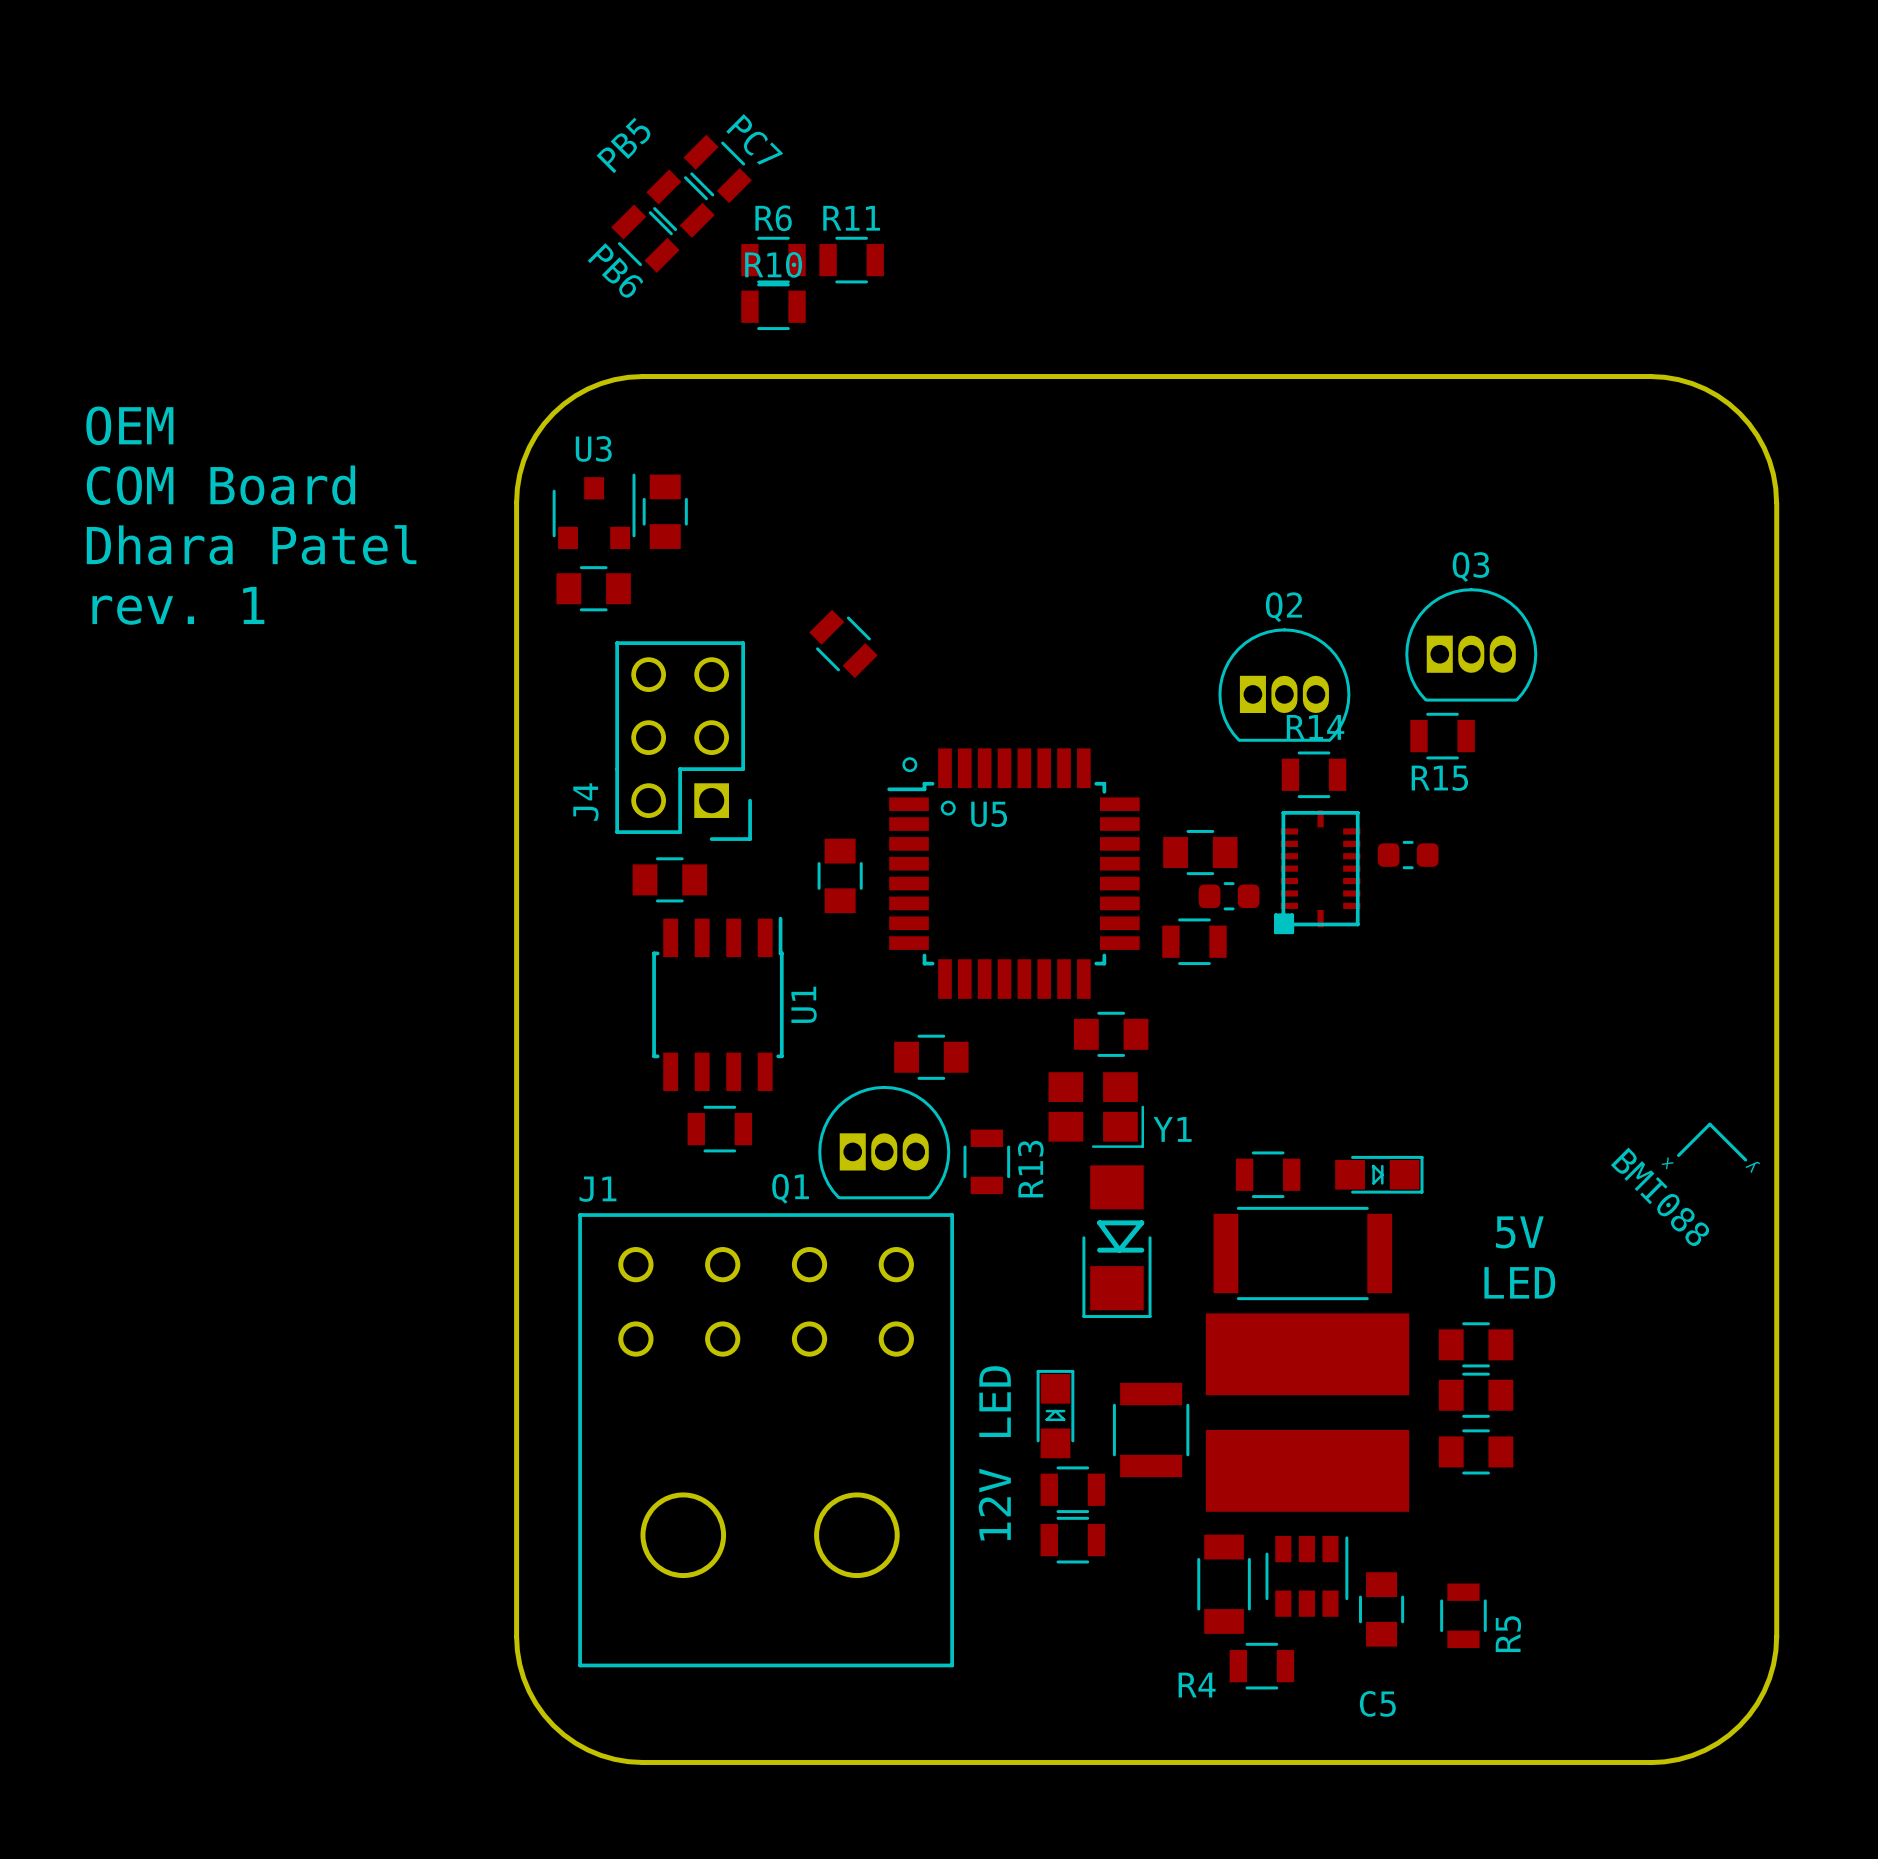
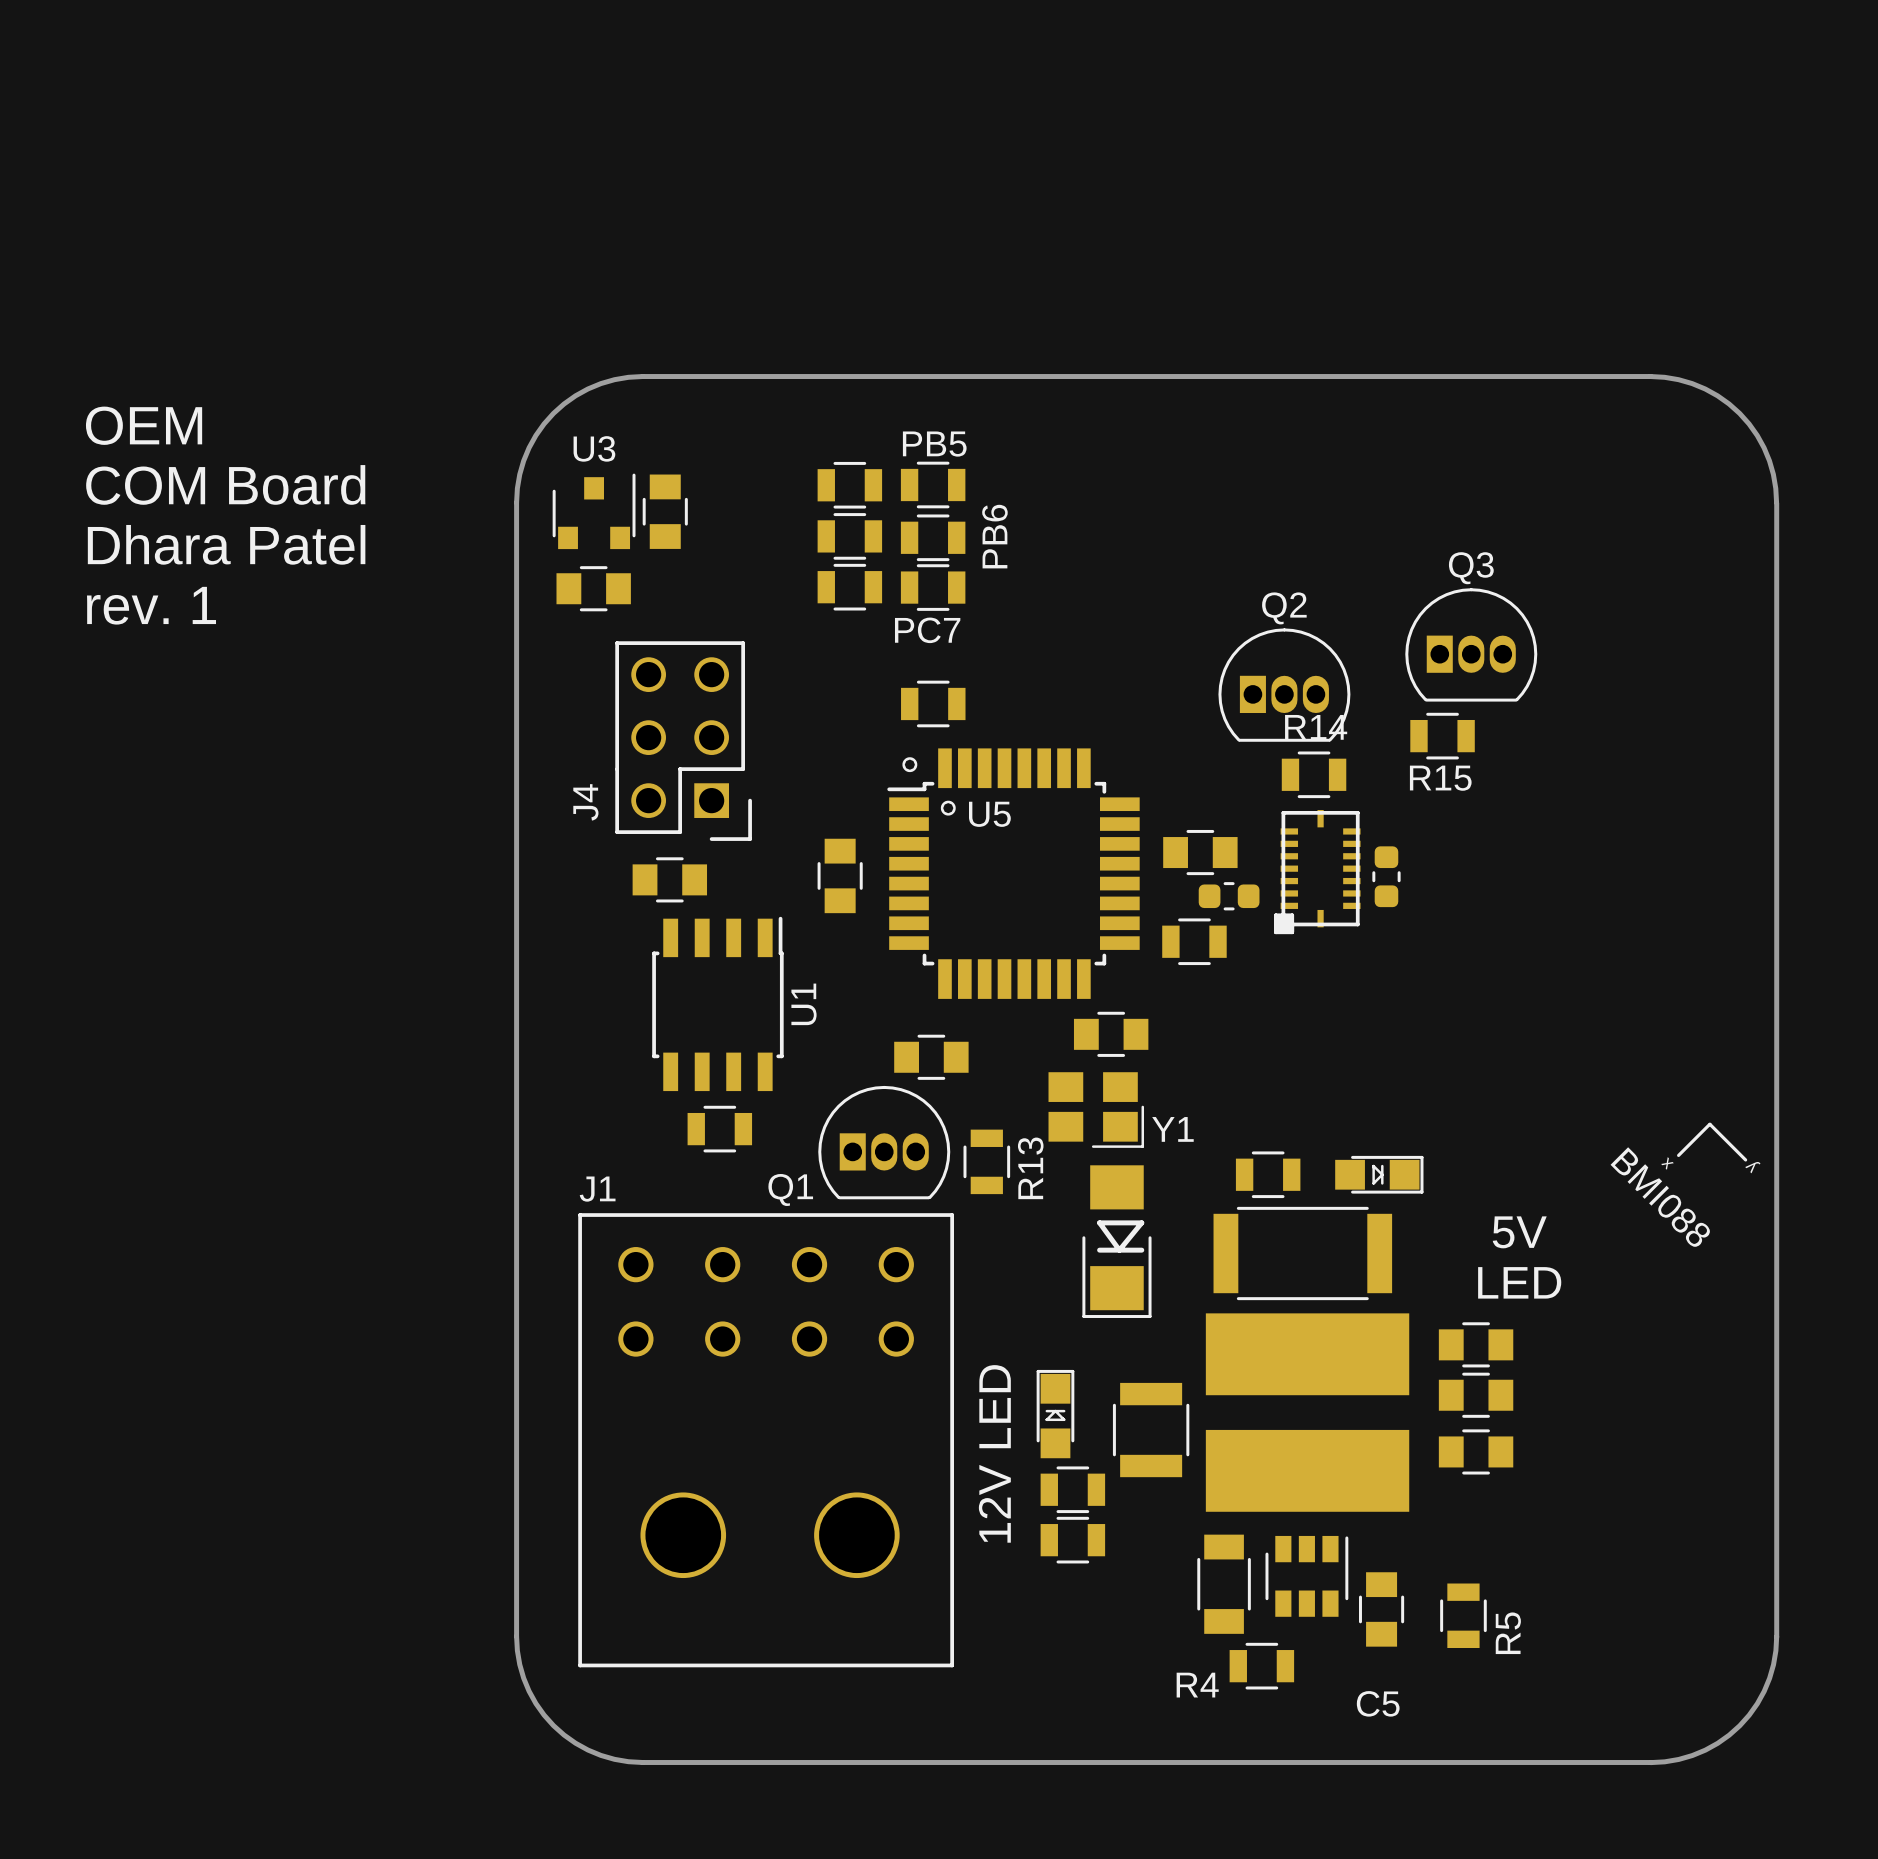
PC7 name position: PC7 (754, 139) -> PC7 (927, 630)
PB5 name position: PB5 (623, 145) -> PB5 (934, 444)
PC7 rotation: 0° (717, 168) -> 45° counterclockwise (933, 587)
PC7 position: (717, 168) -> (933, 587)
PB5 rotation: 0° (680, 203) -> 45° counterclockwise (933, 485)
PB5 position: (680, 203) -> (933, 485)
PB6 rotation: 0° (645, 238) -> 45° counterclockwise (933, 537)
PB6 position: (645, 238) -> (933, 537)
R6: (773, 260) -> none
R11: (851, 260) -> none
PB6 name position: PB6 (615, 270) -> PB6 (994, 536)
R10: (773, 306) -> none
part: none -> (849, 485)
part: none -> (849, 536)
part: none -> (849, 587)
part: (843, 643) -> none
part: none -> (933, 703)
part rotation: 0° (1408, 855) -> 90° clockwise (1386, 876)

